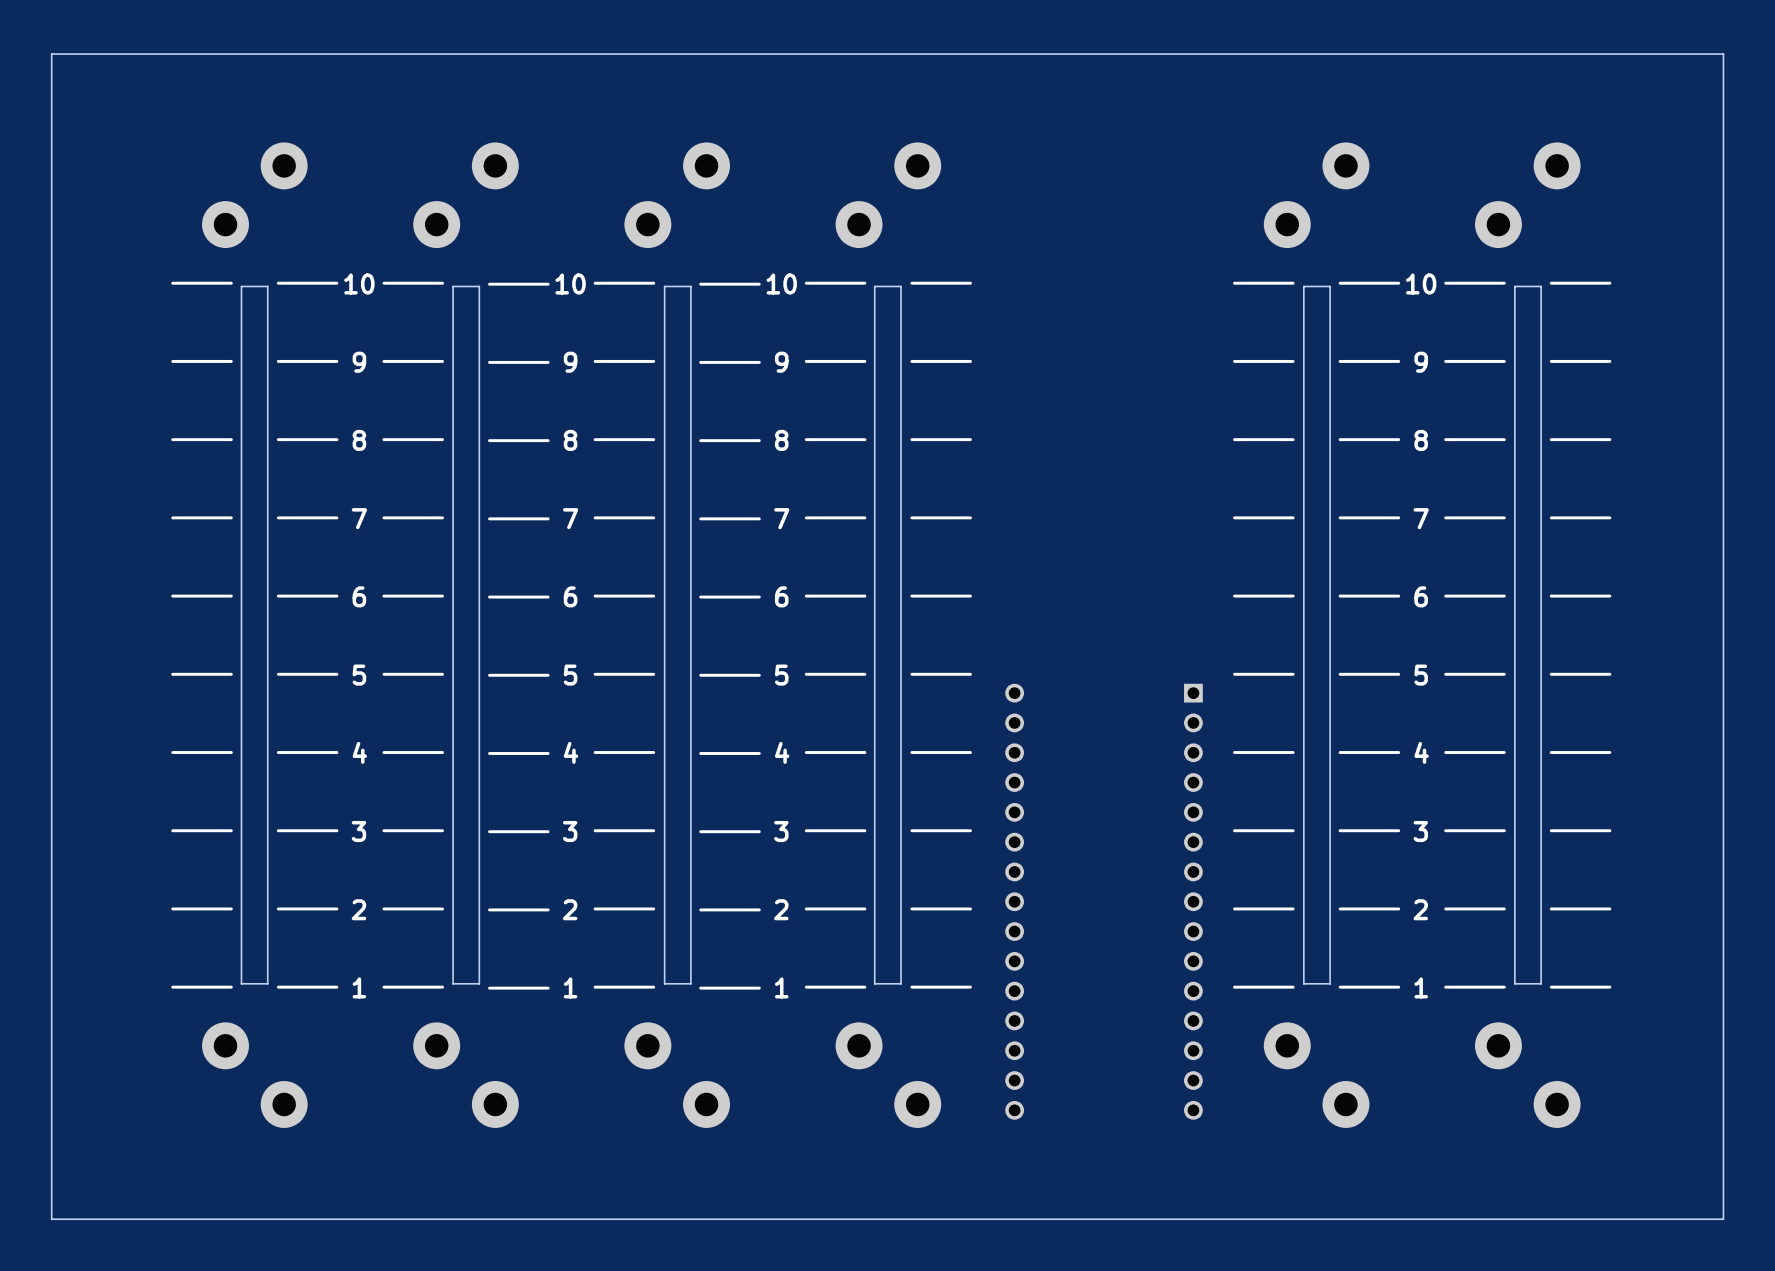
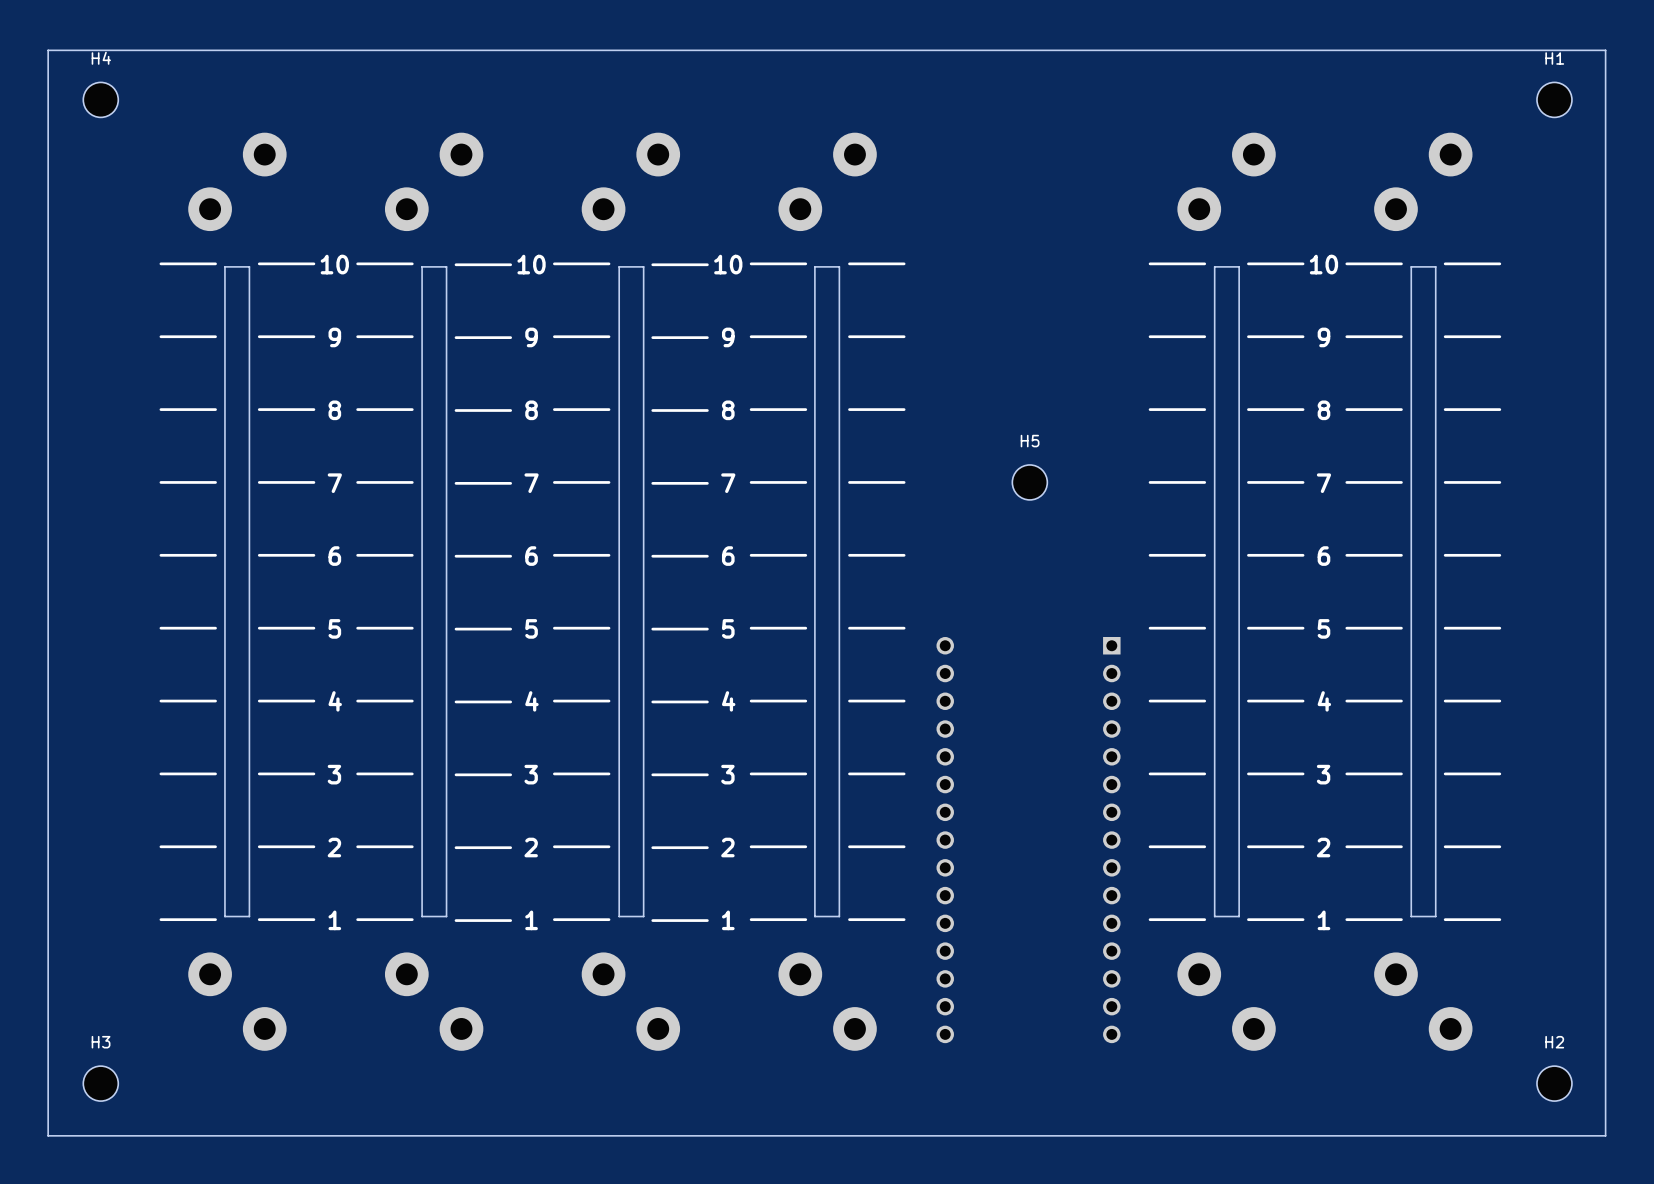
H4: none -> (100, 99)
H1: none -> (1554, 99)
H5: none -> (1029, 482)
H3: none -> (100, 1083)
H2: none -> (1554, 1083)

